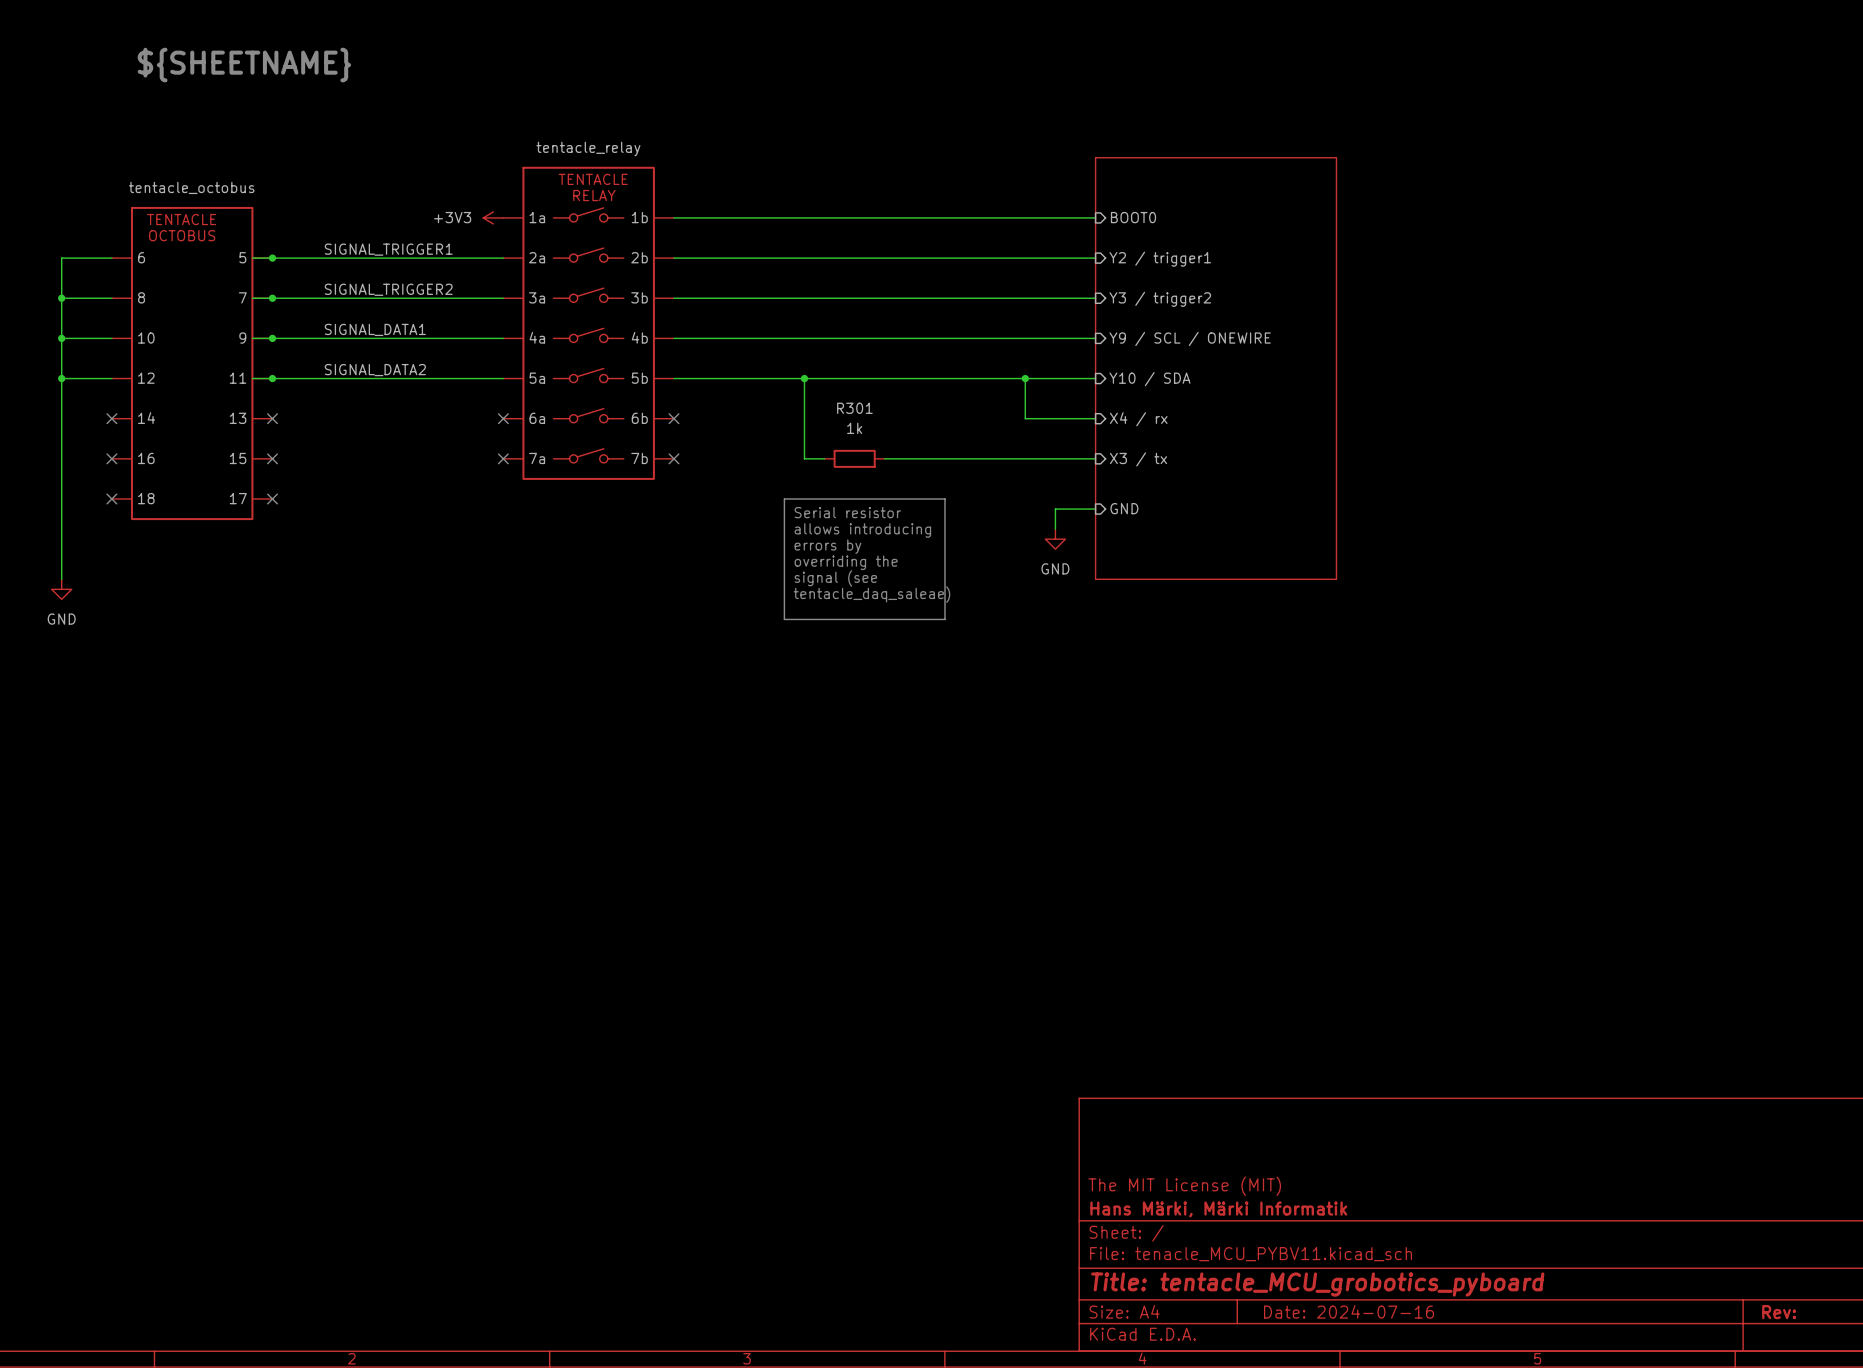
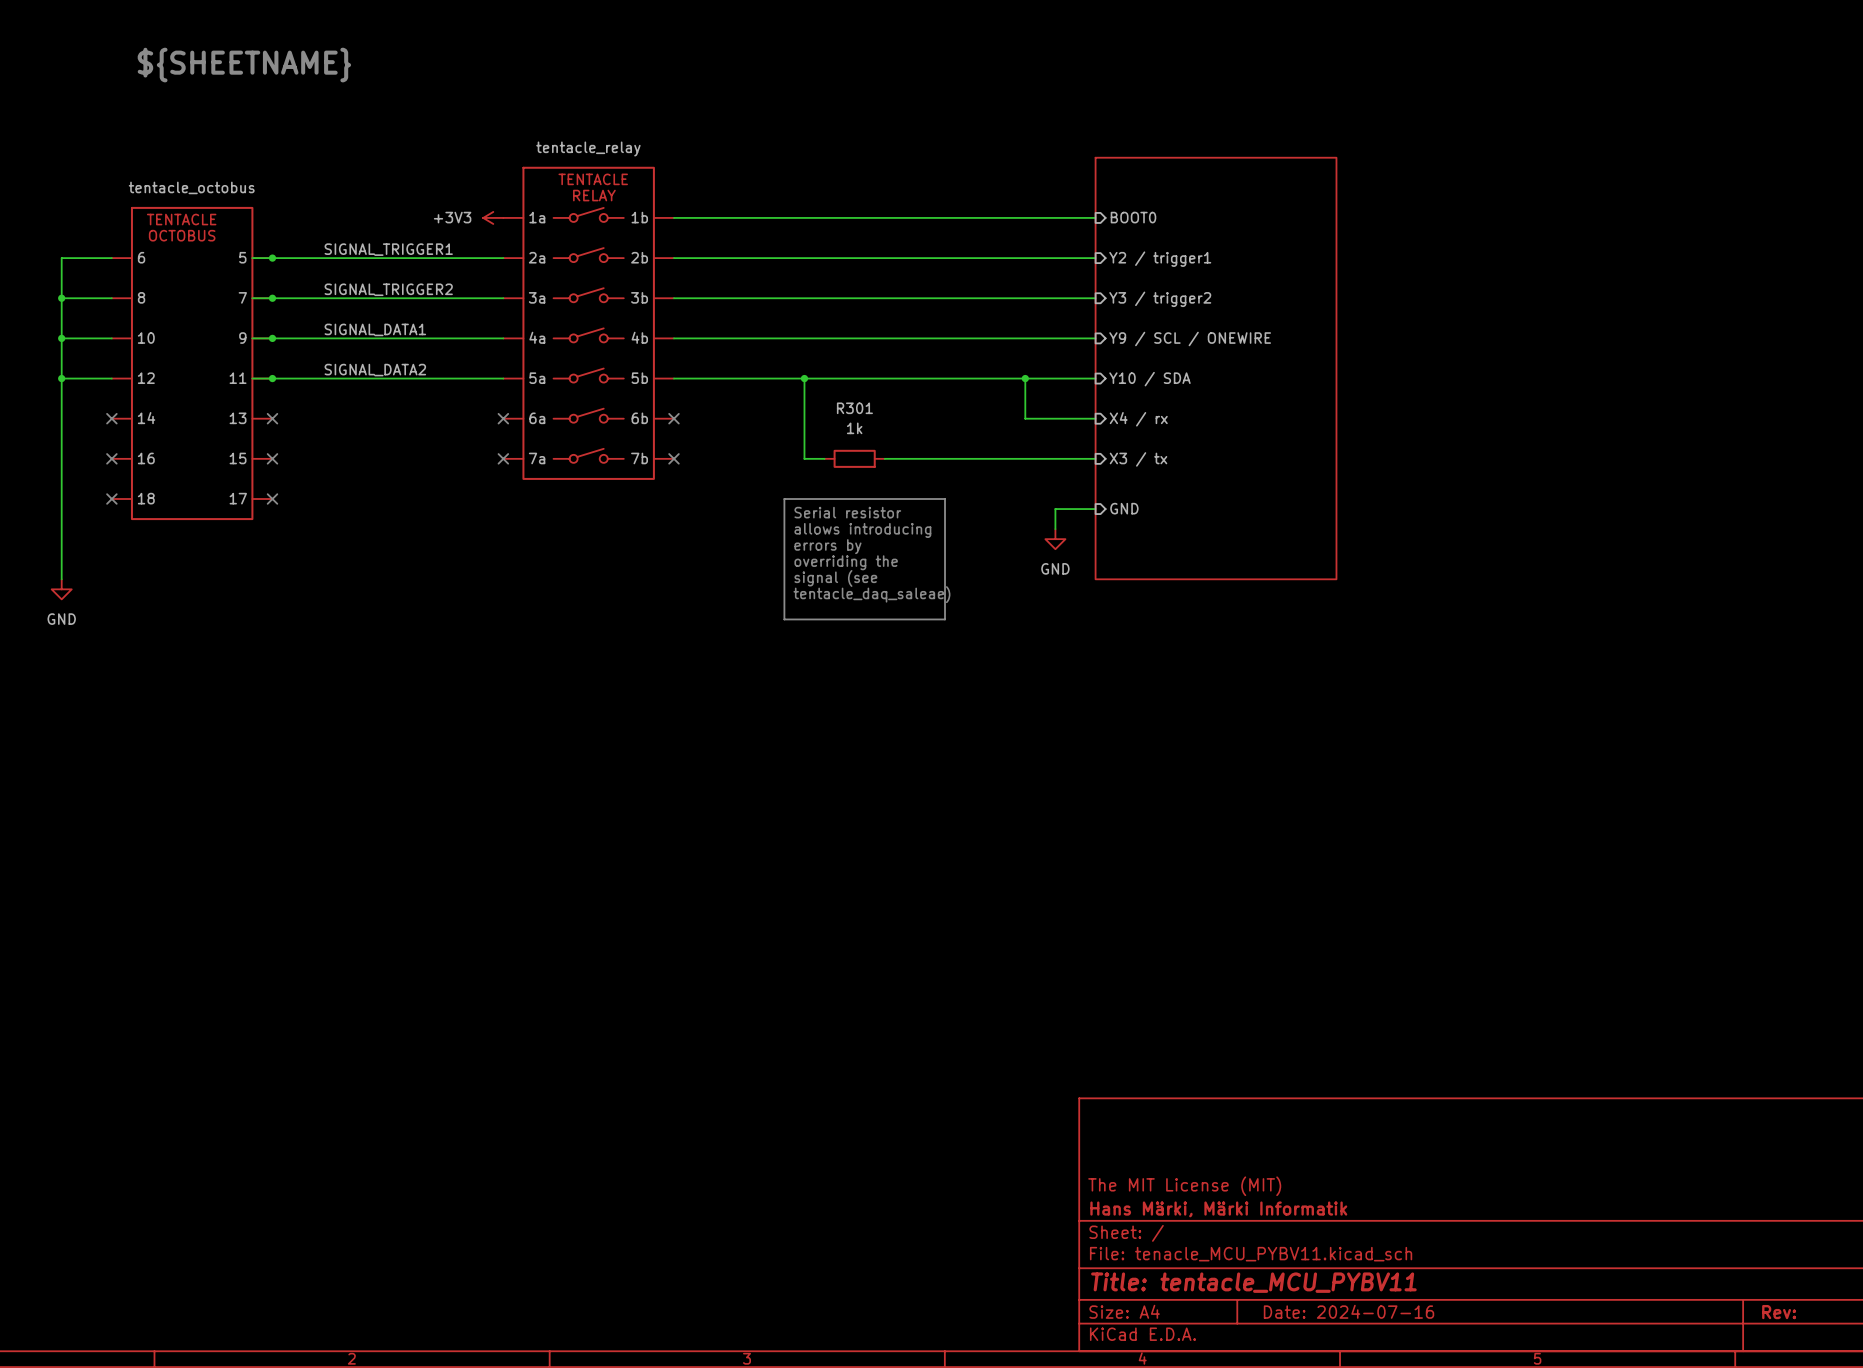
title block: Title: tentacle_MCU_grobotics_pyboard (1317, 1284) -> Title: tentacle_MCU_PYBV11 (1253, 1282)

